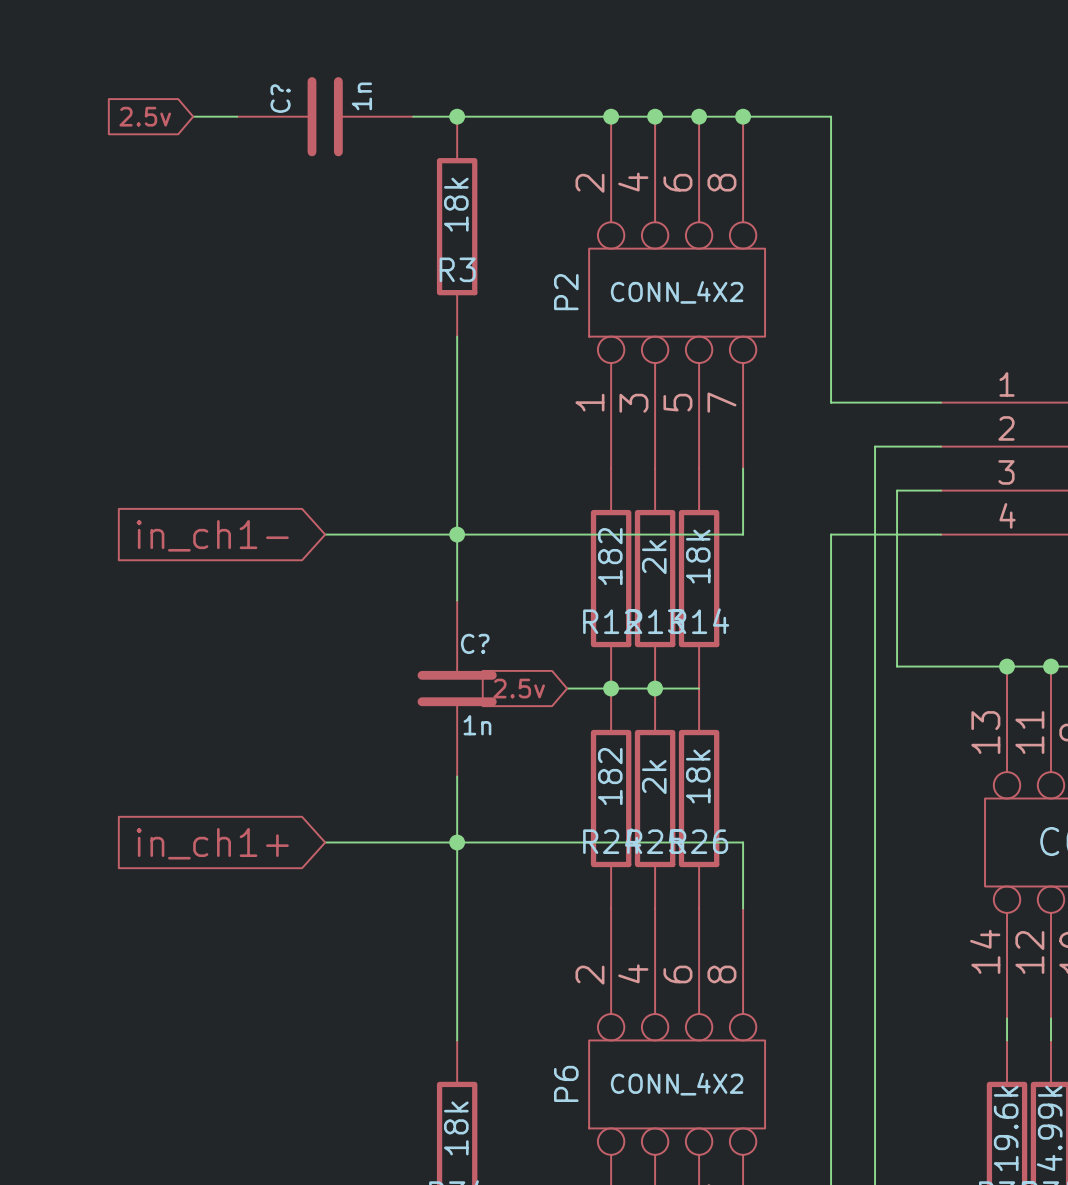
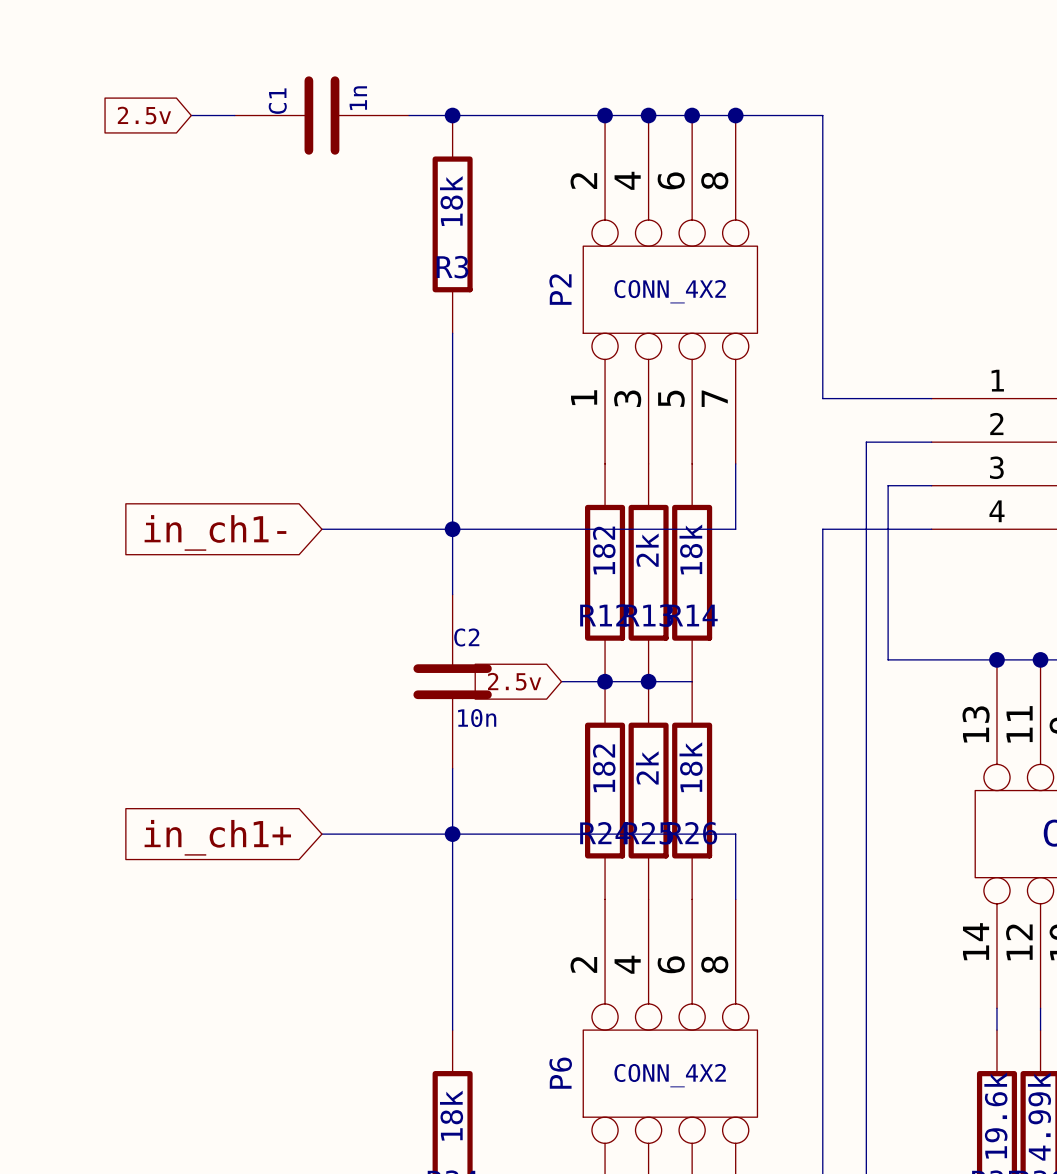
C? name: C? (280, 98) -> C1 (277, 101)
C? name: C? (475, 643) -> C2 (466, 637)
C? value: 1n (477, 725) -> 10n (477, 718)

